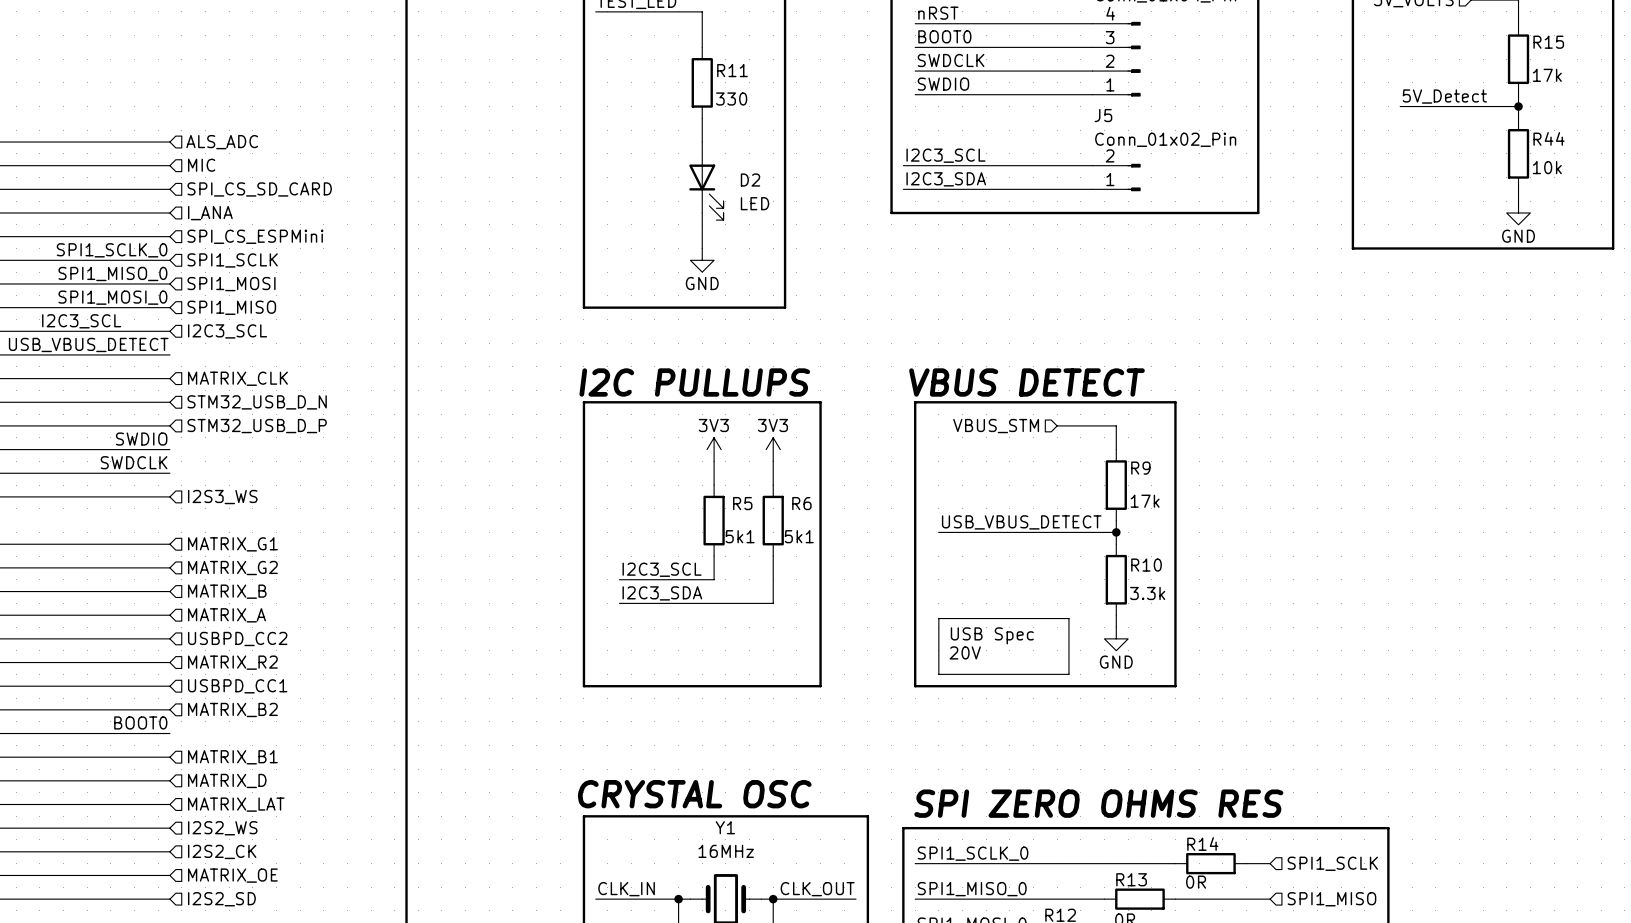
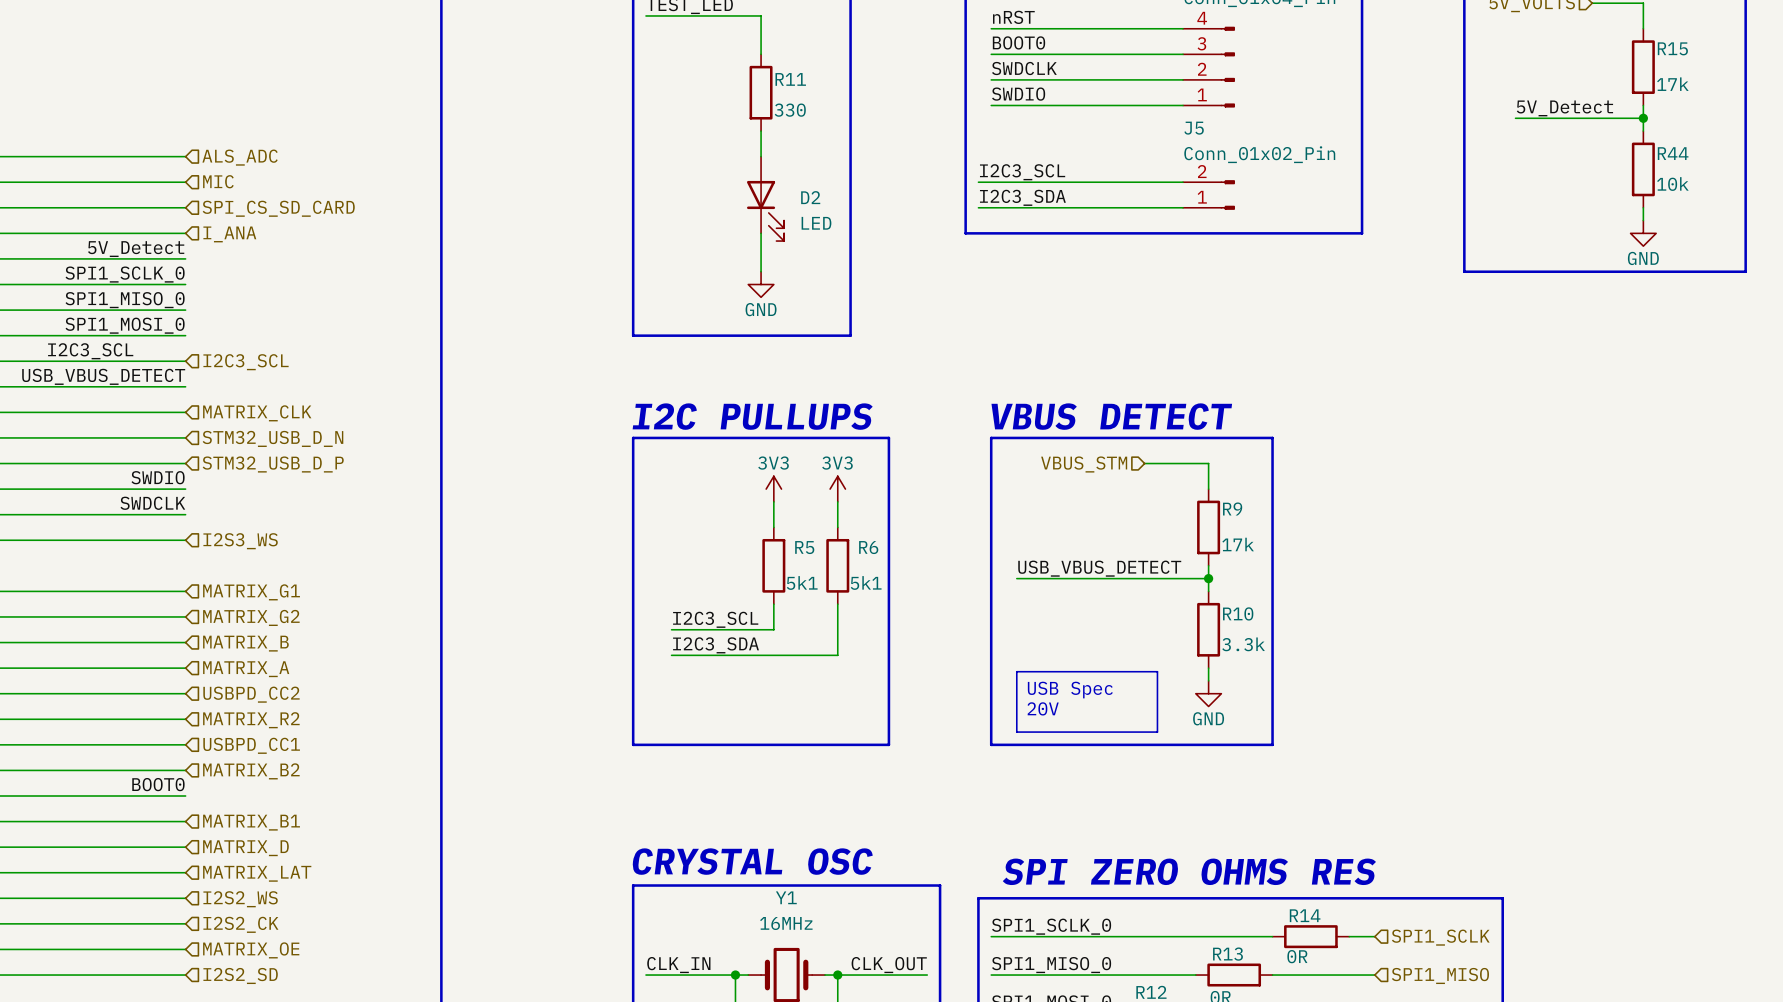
label: none -> 5V_Detect (136, 249)
hierarchical label: SPI_CS_ESPMini (255, 236) -> none
hierarchical label: SPI1_SCLK (232, 260) -> none
hierarchical label: SPI1_MOSI (231, 284) -> none
hierarchical label: SPI1_MISO (231, 307) -> none

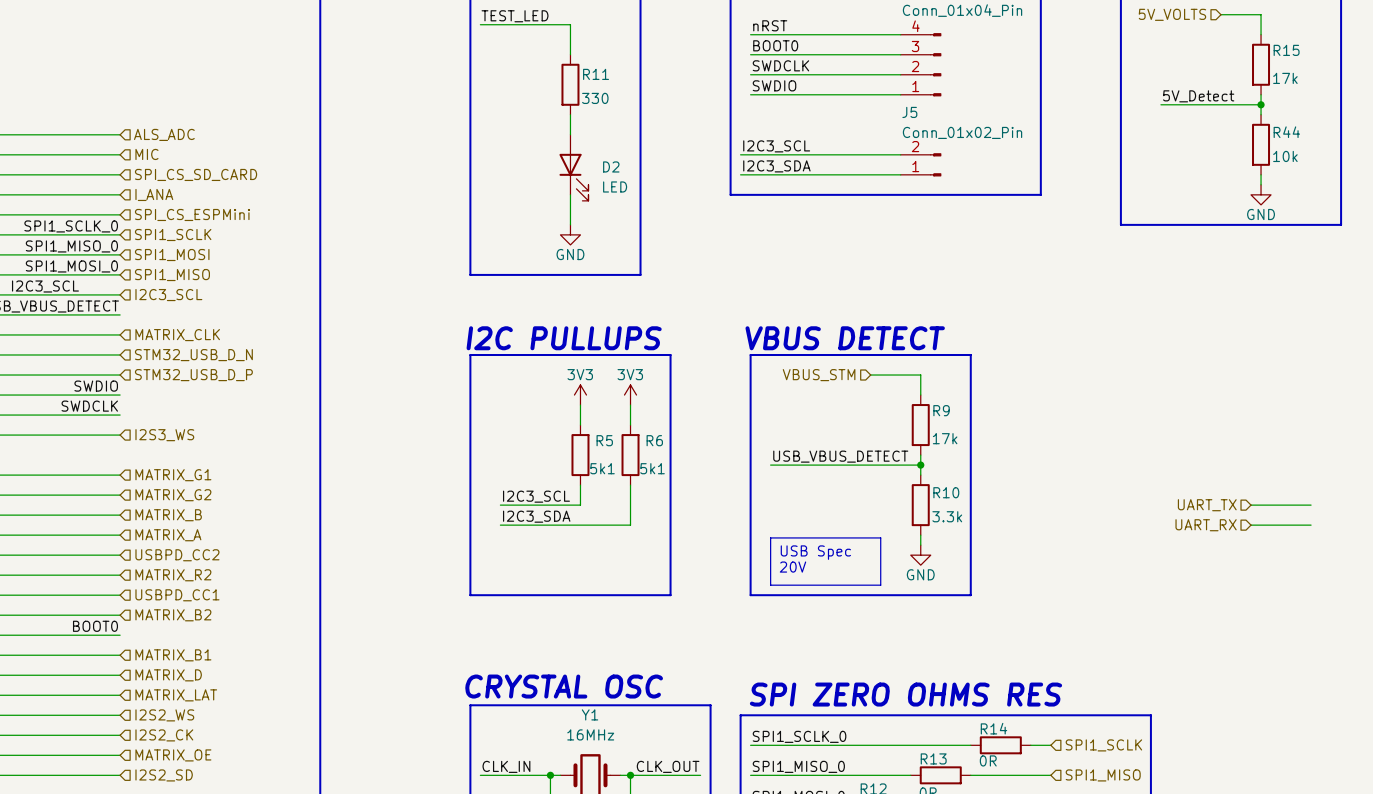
label: 5V_Detect (136, 249) -> none
hierarchical label: none -> SPI_CS_ESPMini (192, 214)
hierarchical label: none -> SPI1_SCLK (173, 235)
hierarchical label: none -> SPI1_MOSI (172, 255)
hierarchical label: none -> SPI1_MISO (172, 275)
wire: none -> (1251, 505) (1311, 505)
hierarchical label: none -> UART_TX (1207, 505)
wire: none -> (1251, 525) (1311, 525)
hierarchical label: none -> UART_RX (1206, 525)

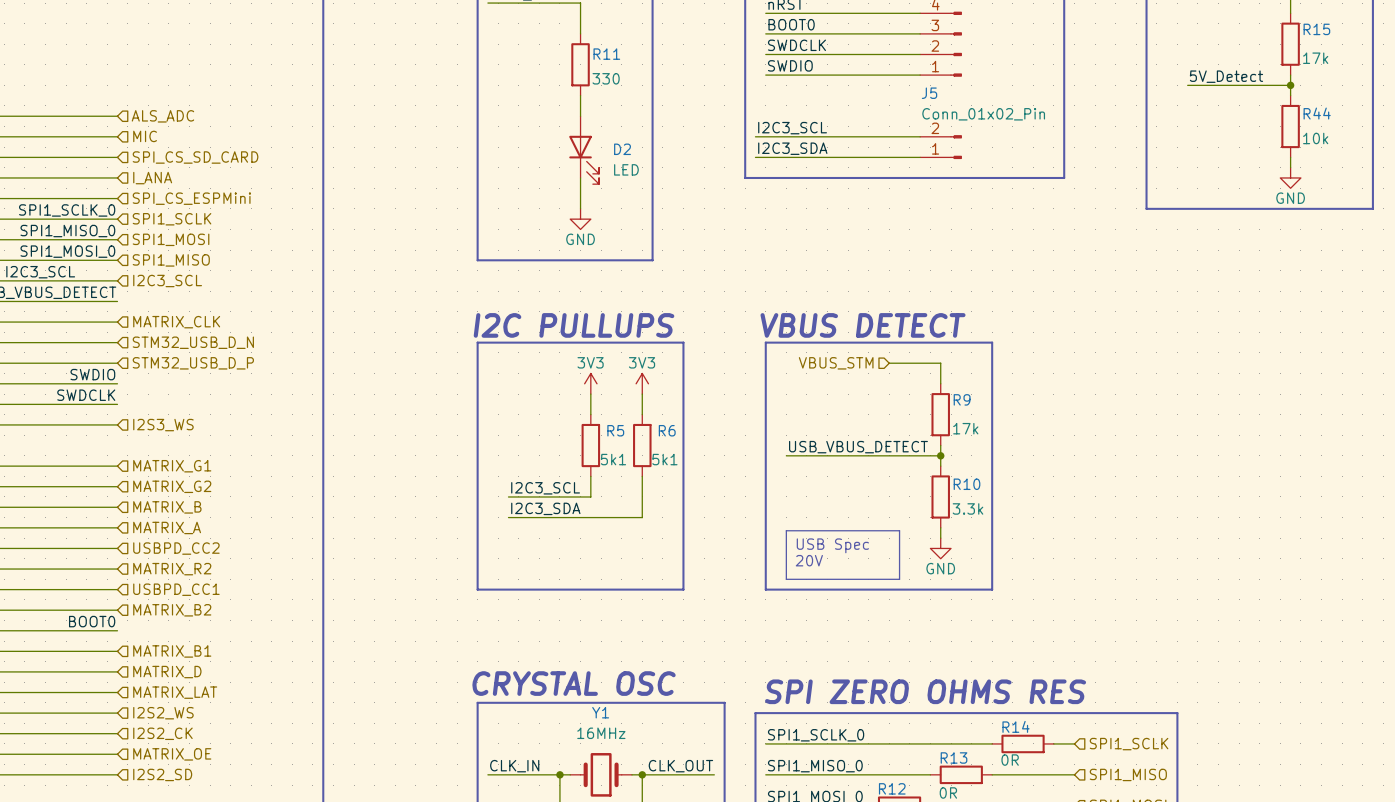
hierarchical label: UART_TX (1207, 505) -> none
wire: (1251, 505) (1311, 505) -> none
hierarchical label: UART_RX (1206, 525) -> none
wire: (1251, 525) (1311, 525) -> none

